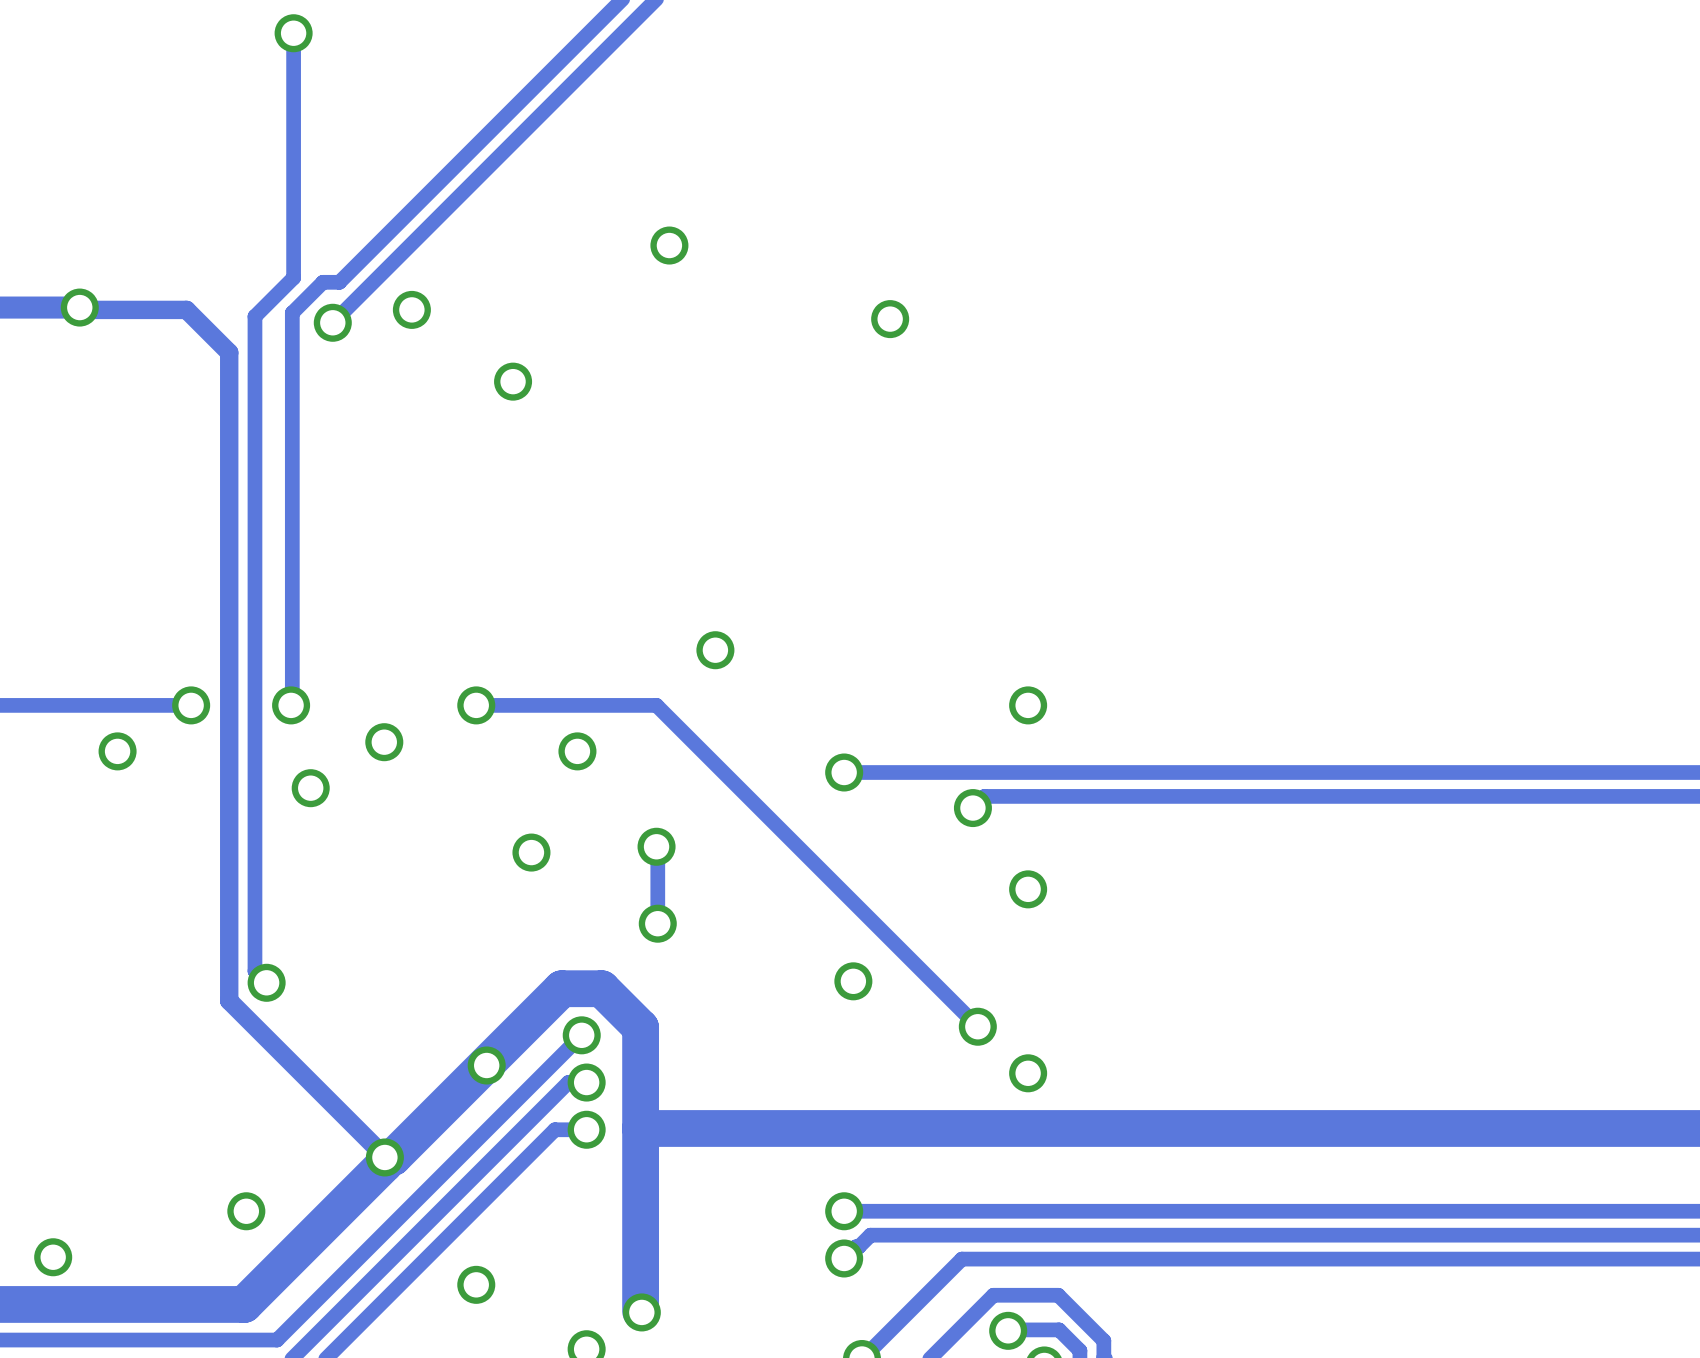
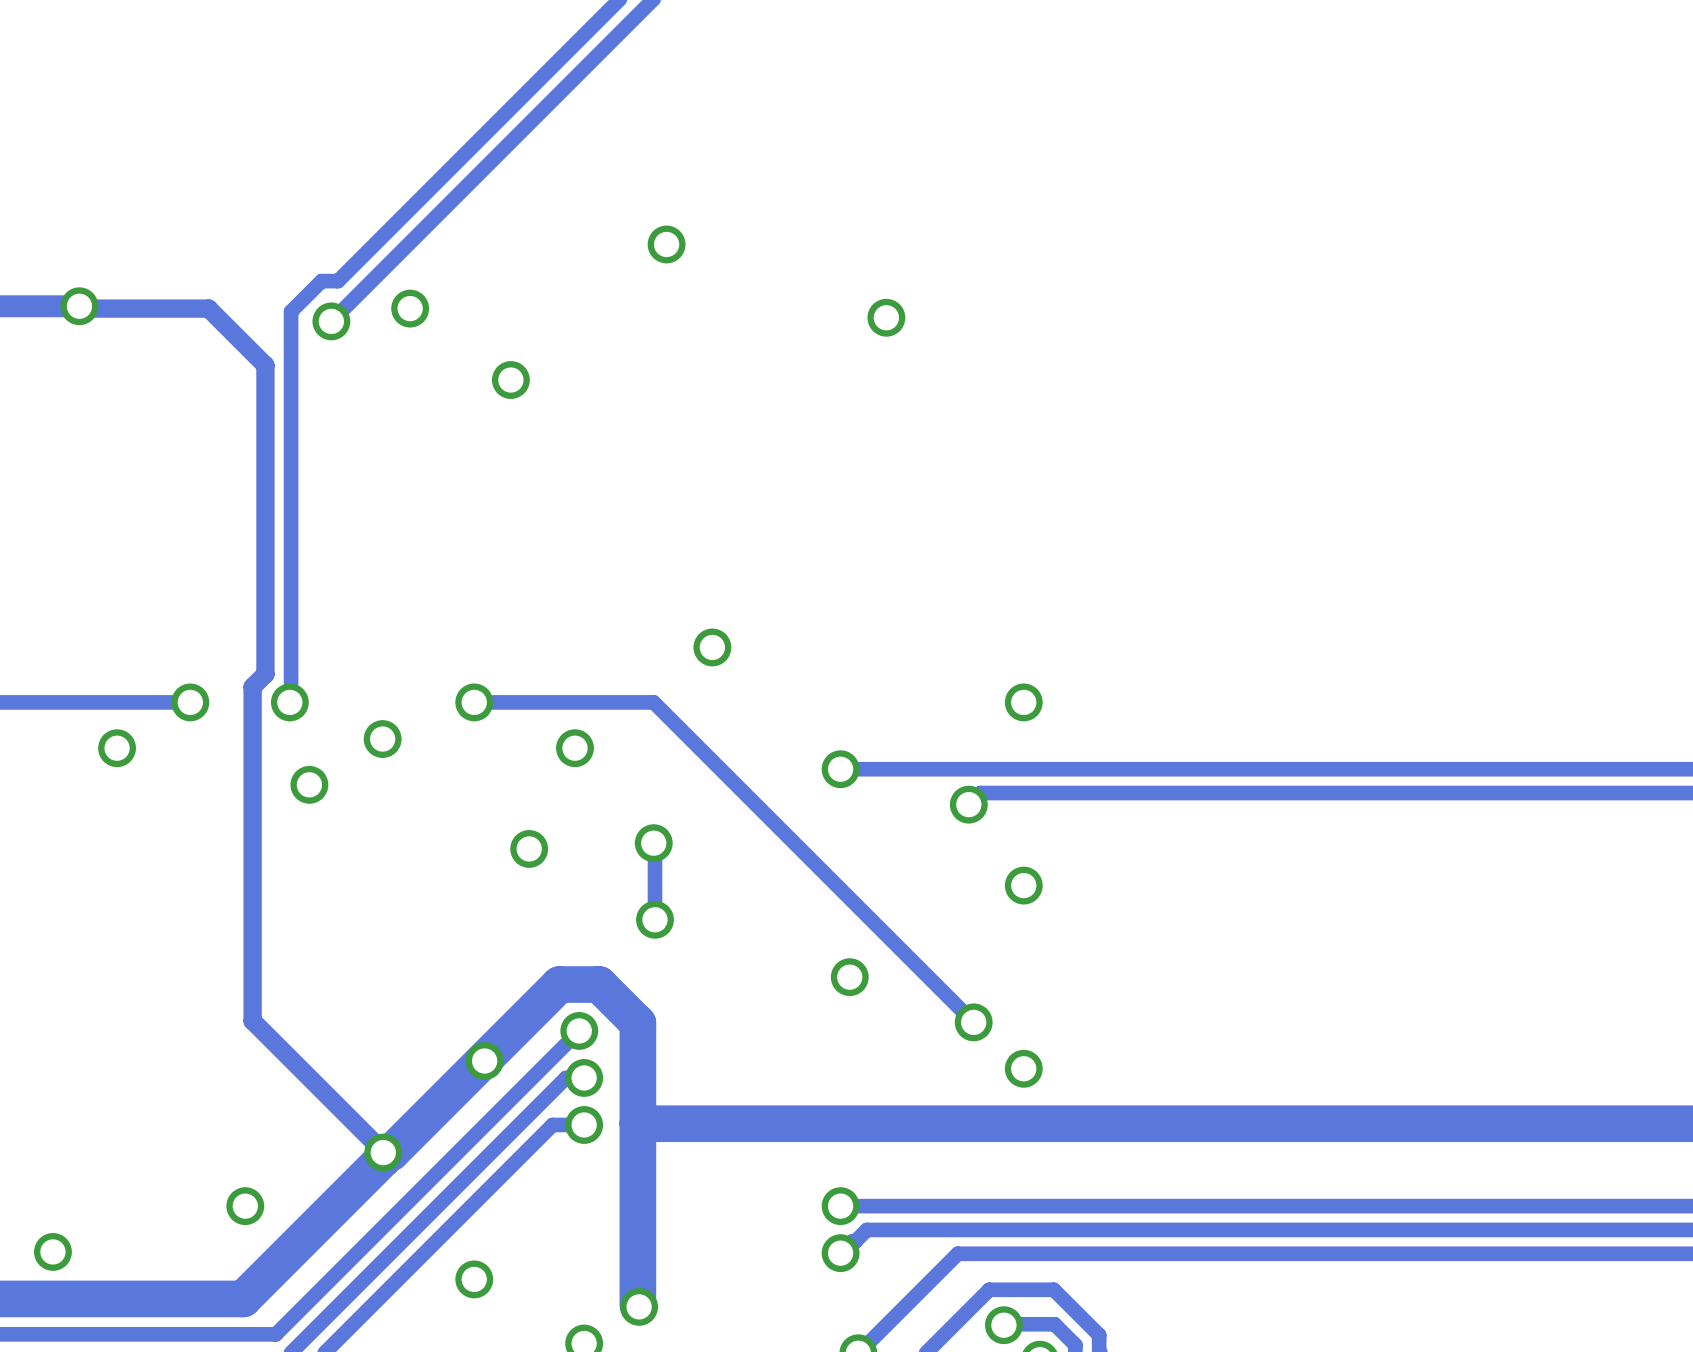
track: (293, 33) (293, 277) (254, 316) (254, 971) (266, 982) -> none
via: (293, 33) -> none
track: (186, 309) (229, 352) (229, 1000) (253, 1025) -> (185, 308) (208, 308) (265, 365) (265, 674) (252, 686) (252, 1020)
via: (266, 982) -> none

